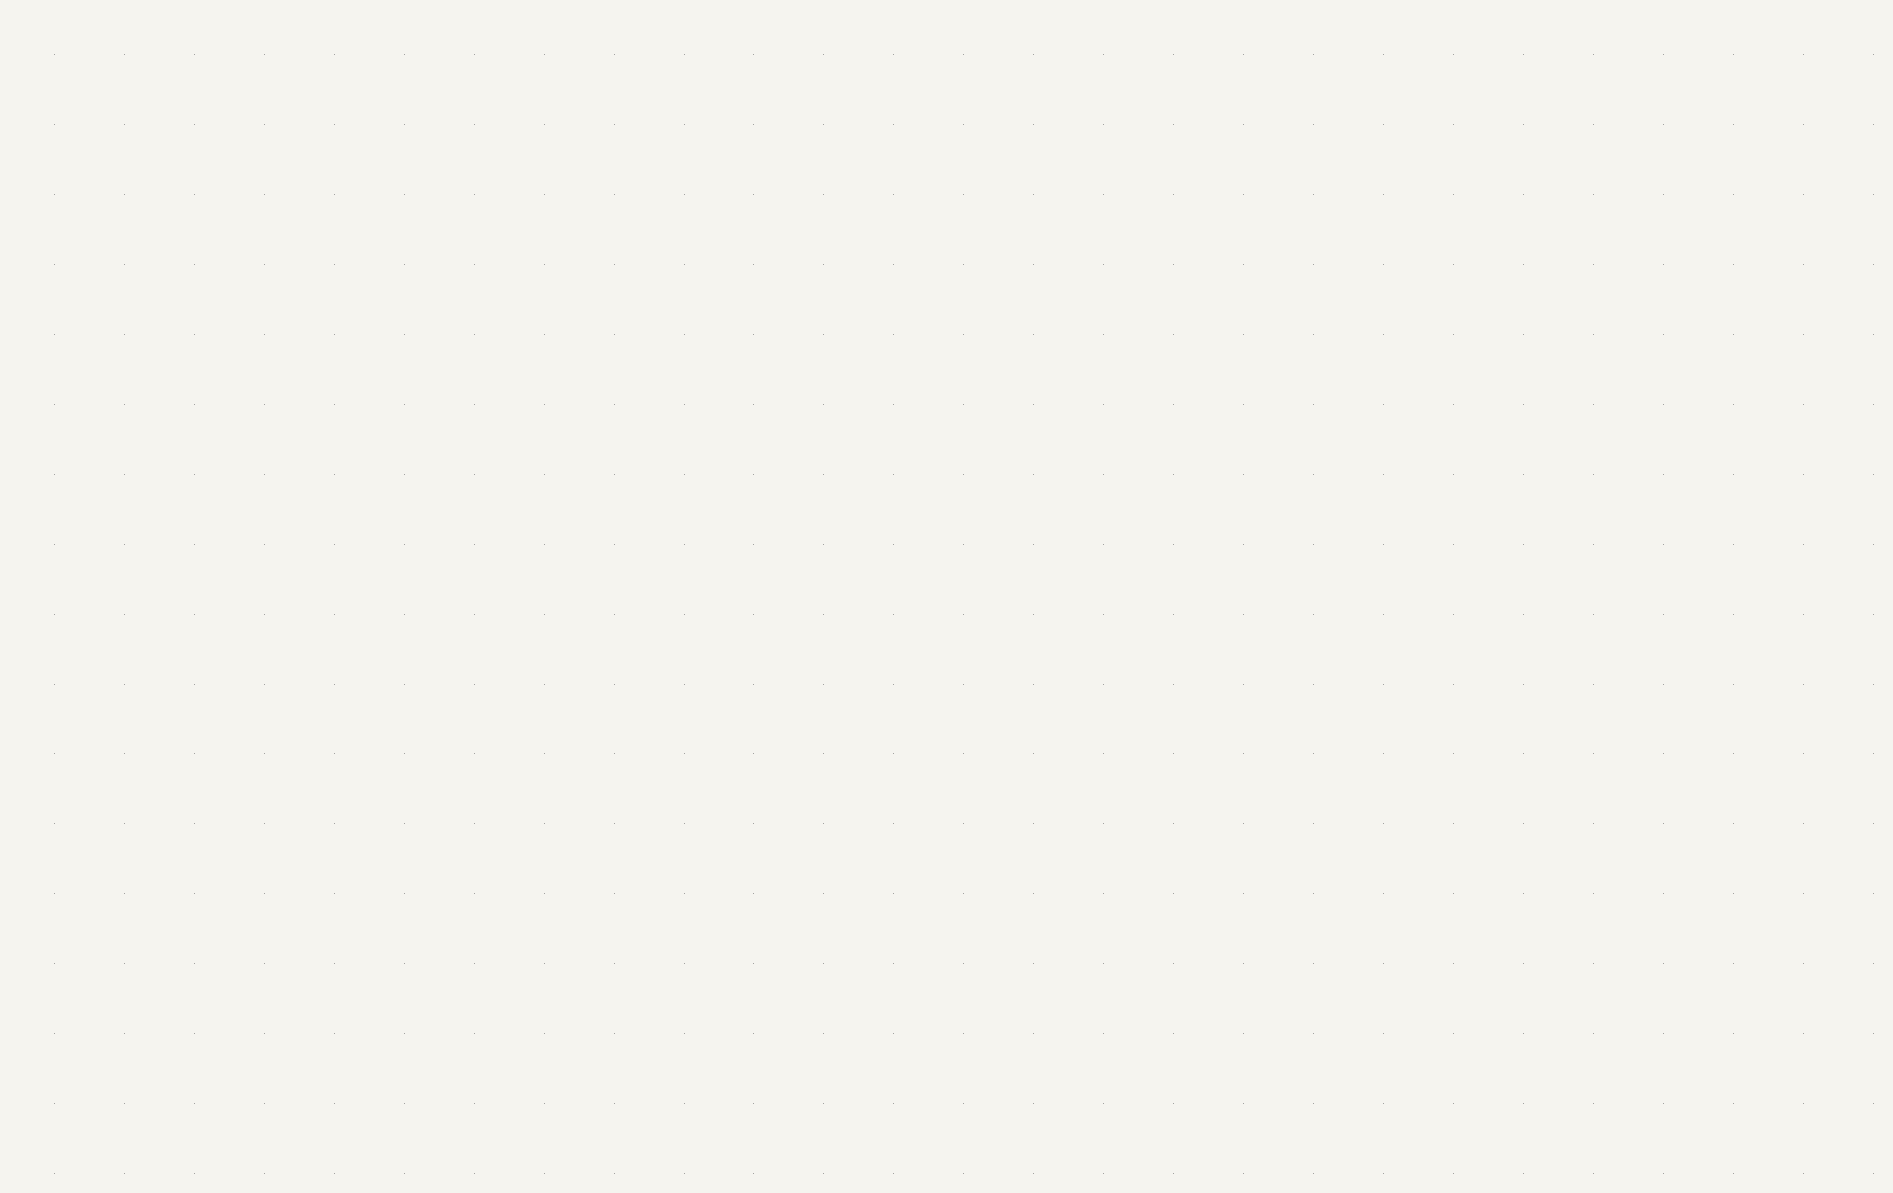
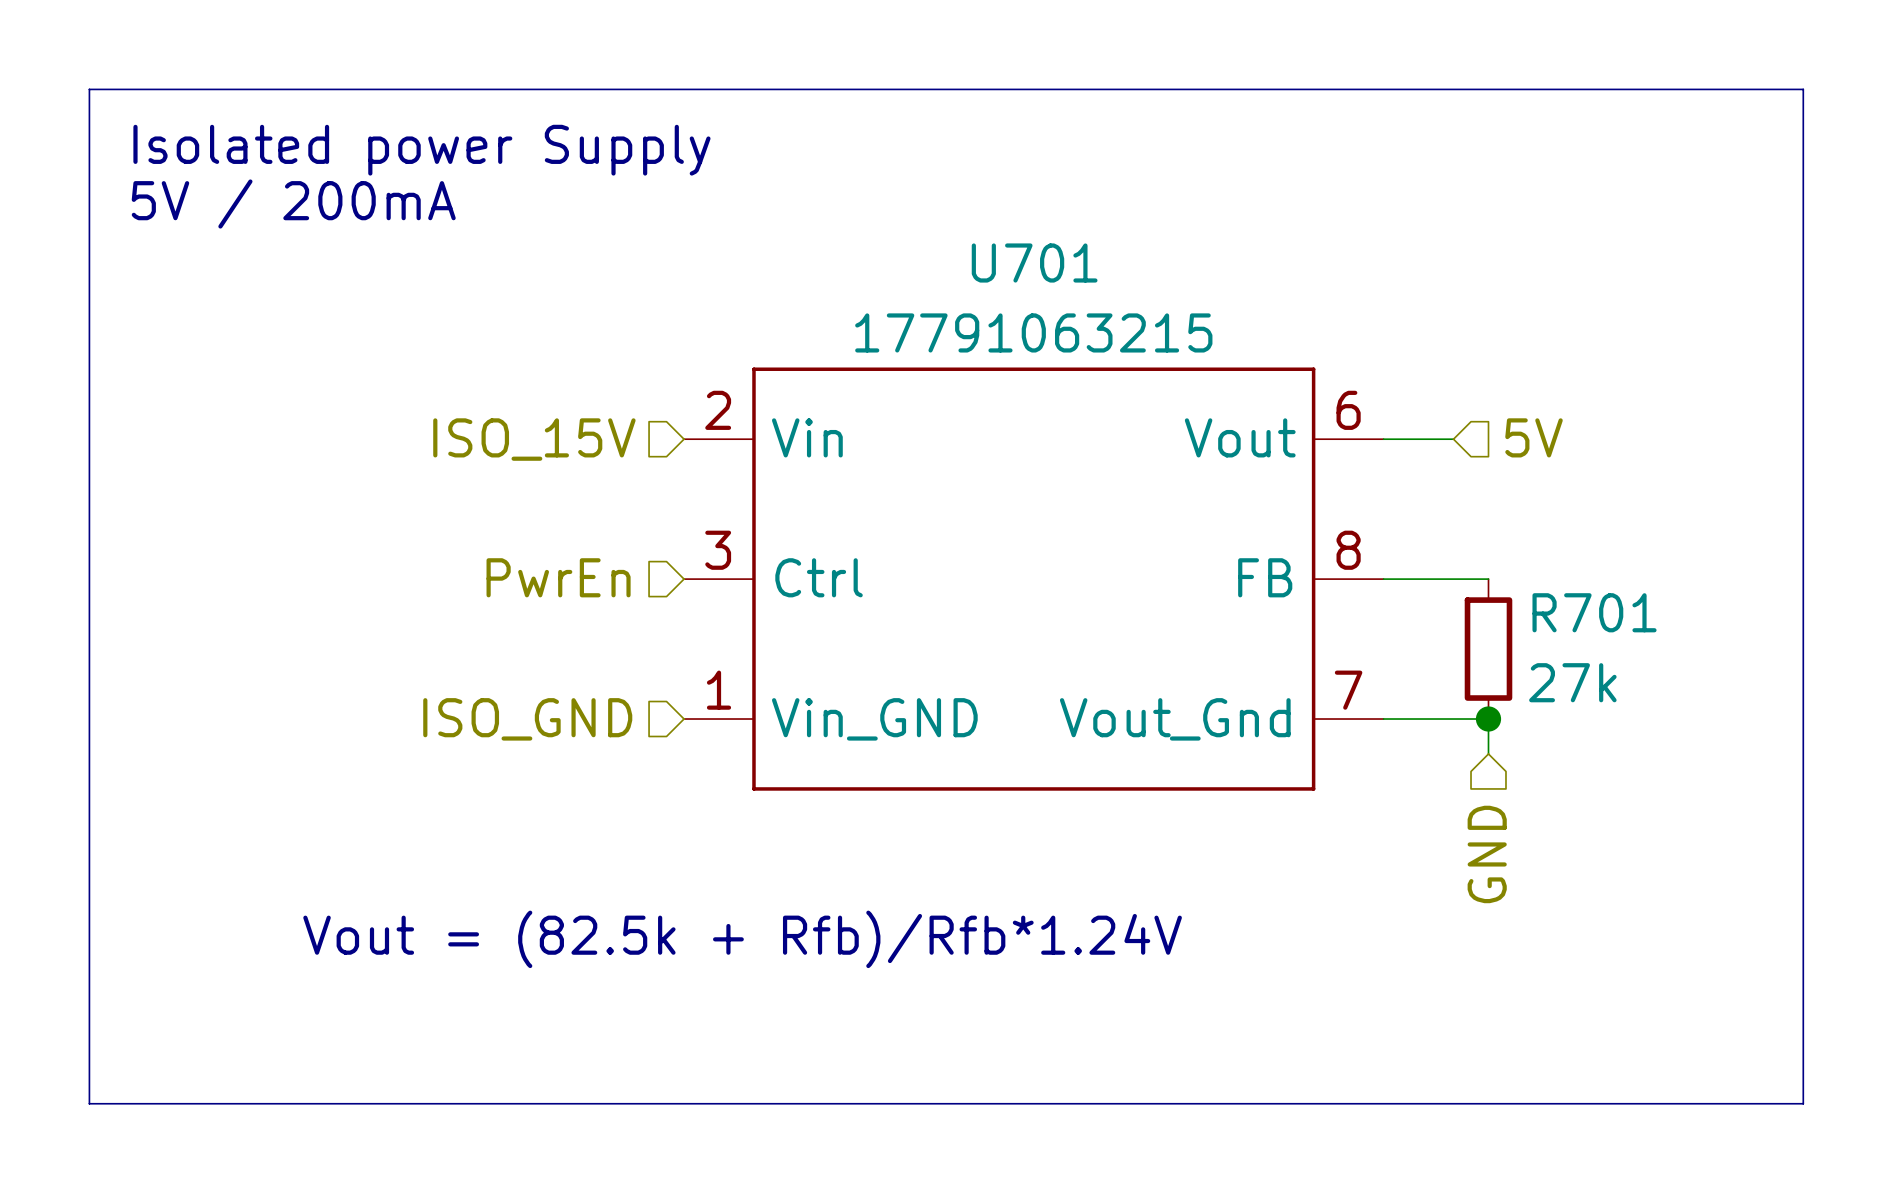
line: none -> (89, 89) (1803, 89) (1803, 1103) (89, 1103) (89, 89)
text: none -> Isolated power Supply (421, 150)
text: none -> 5V / 200mA (293, 204)
hierarchical label: none -> 5V (1534, 437)
hierarchical label: none -> ISO_15V (534, 439)
wire: none -> (1383, 439) (1453, 439)
hierarchical label: none -> PwrEn (558, 577)
U701: none -> 17791063215 (1033, 579)
wire: none -> (1383, 579) (1488, 579)
R701: none -> 27k (1488, 649)
hierarchical label: none -> ISO_GND (527, 719)
wire: none -> (1383, 719) (1488, 719) (1488, 753)
junction: none -> (1488, 719)
hierarchical label: none -> GND (1487, 854)
text: none -> Vout = (82.5k + Rfb)/Rfb*1.24V (742, 939)

